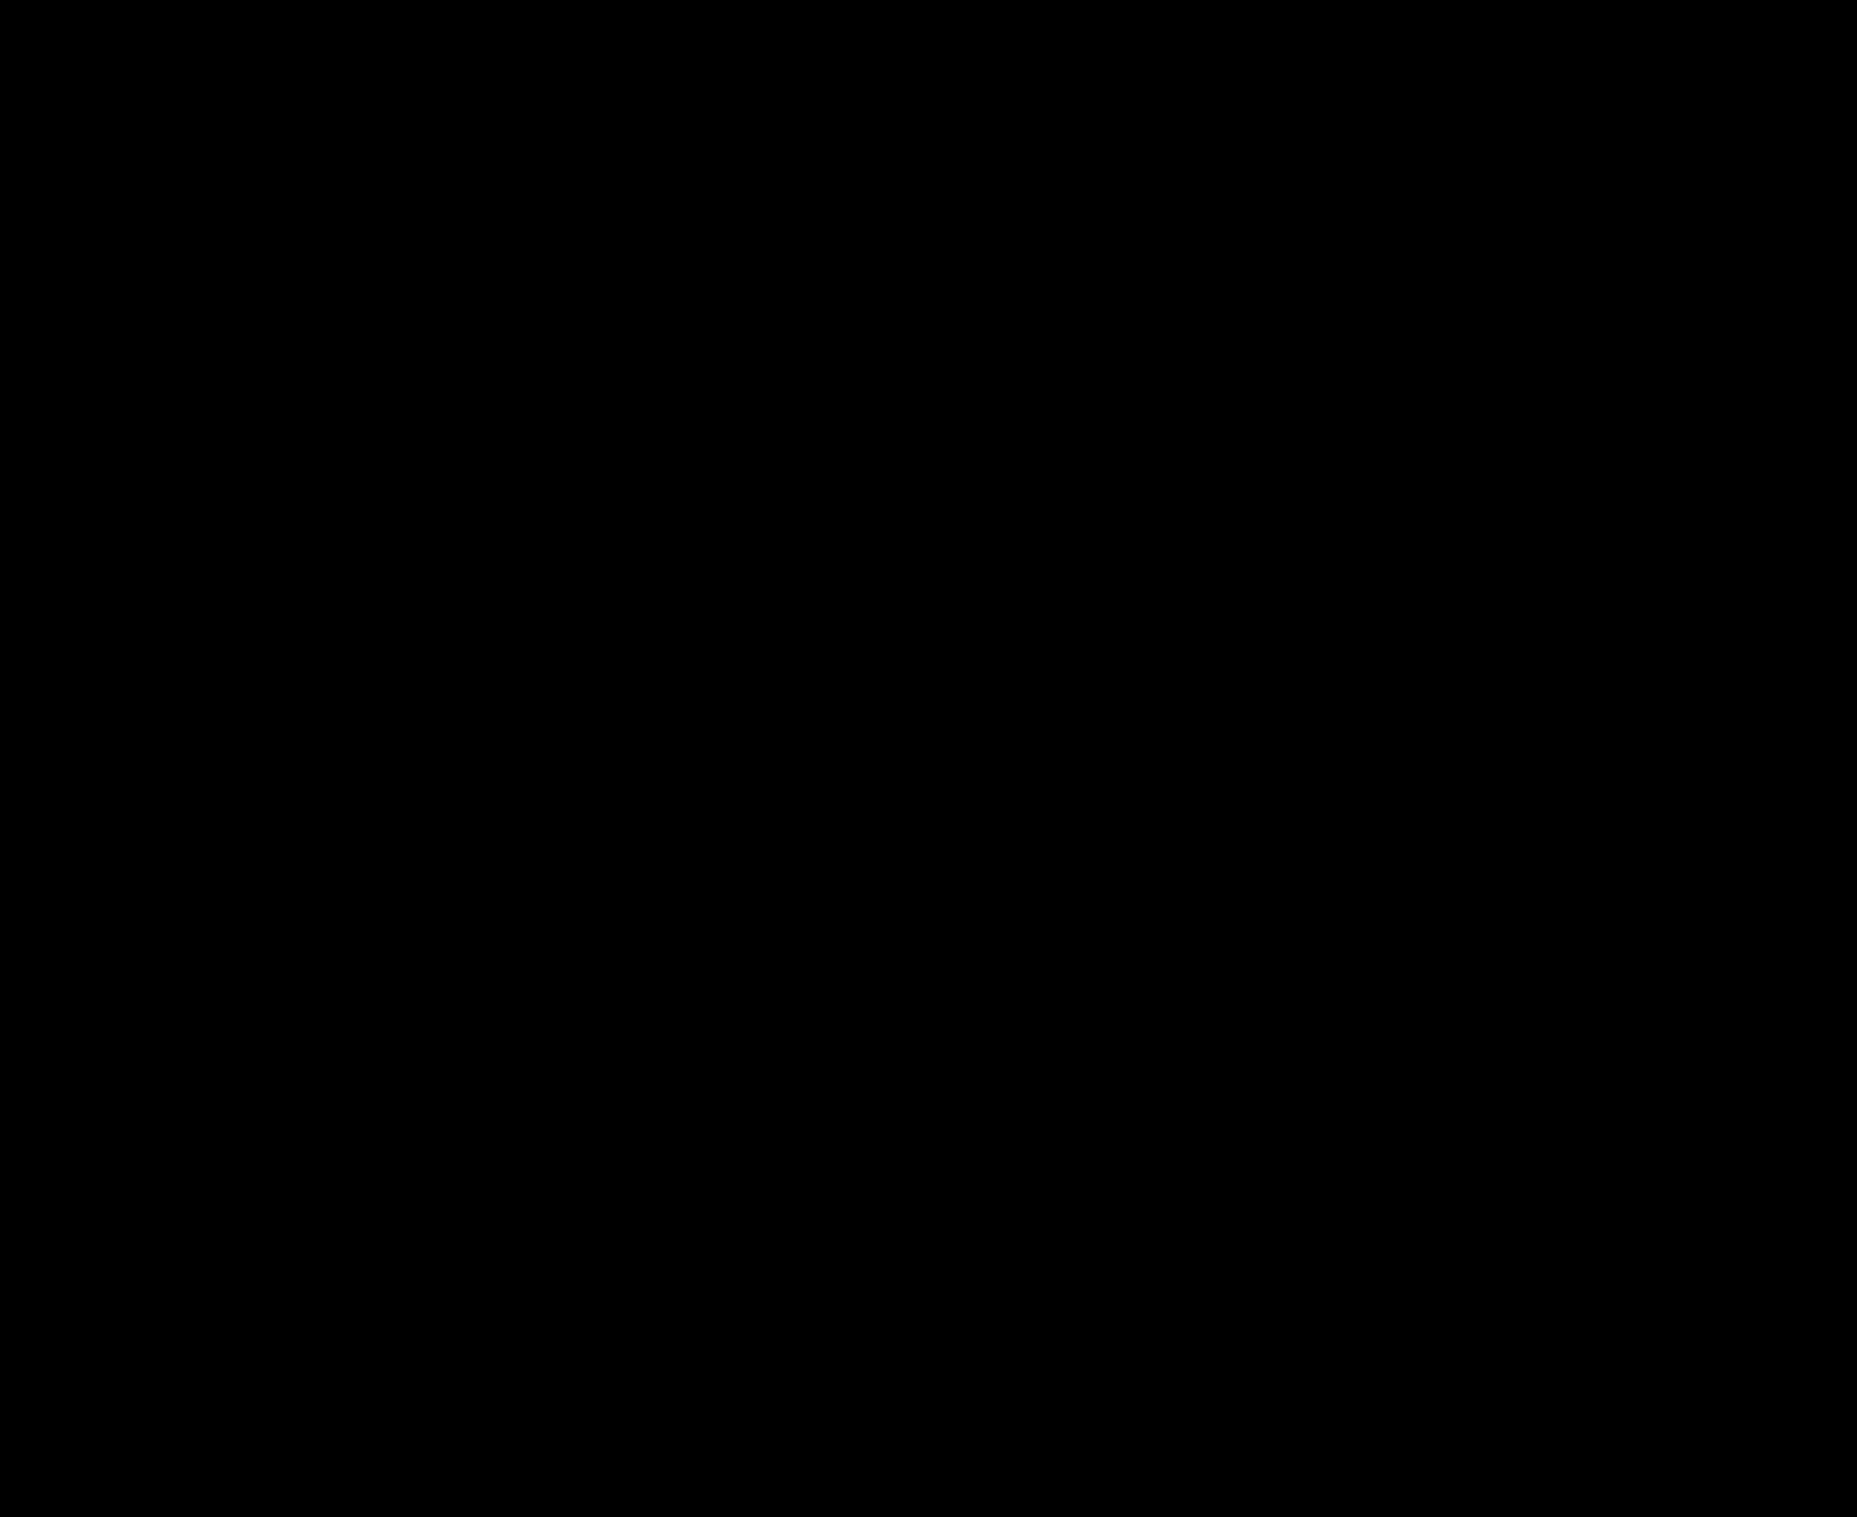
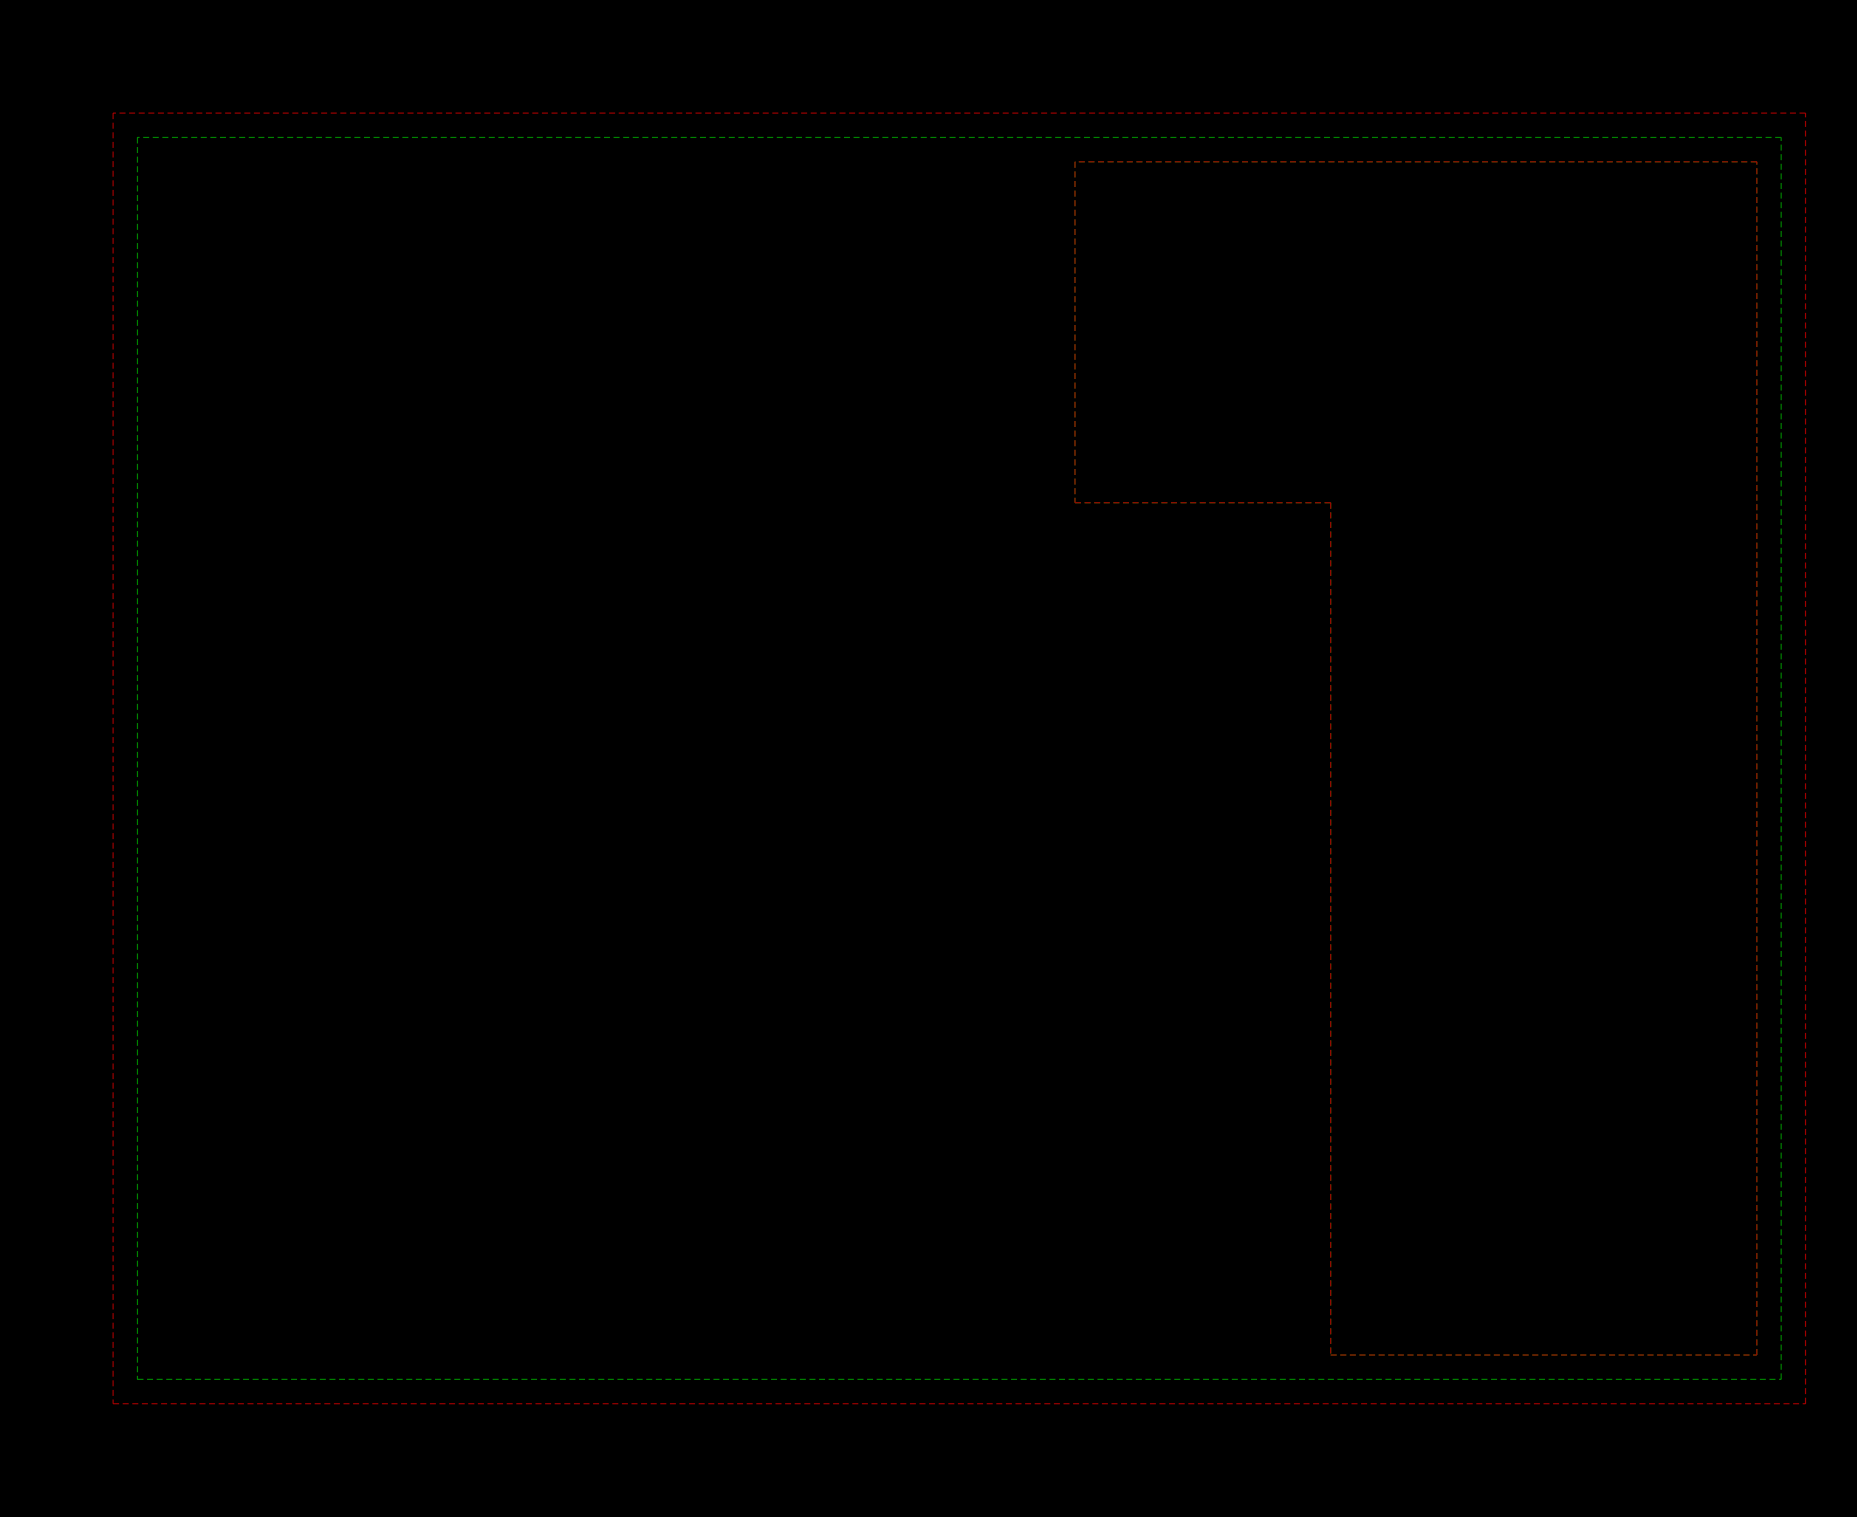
top zone outline: none -> (113, 113) (1805, 113) (1805, 1403) (113, 1403) (113, 113)
bottom zone outline: none -> (137, 137) (1781, 137) (1781, 1379) (137, 1379) (137, 137)
top zone outline: none -> (1074, 161) (1756, 161) (1756, 1355) (1330, 1355) (1330, 502) (1074, 502) (1074, 161)

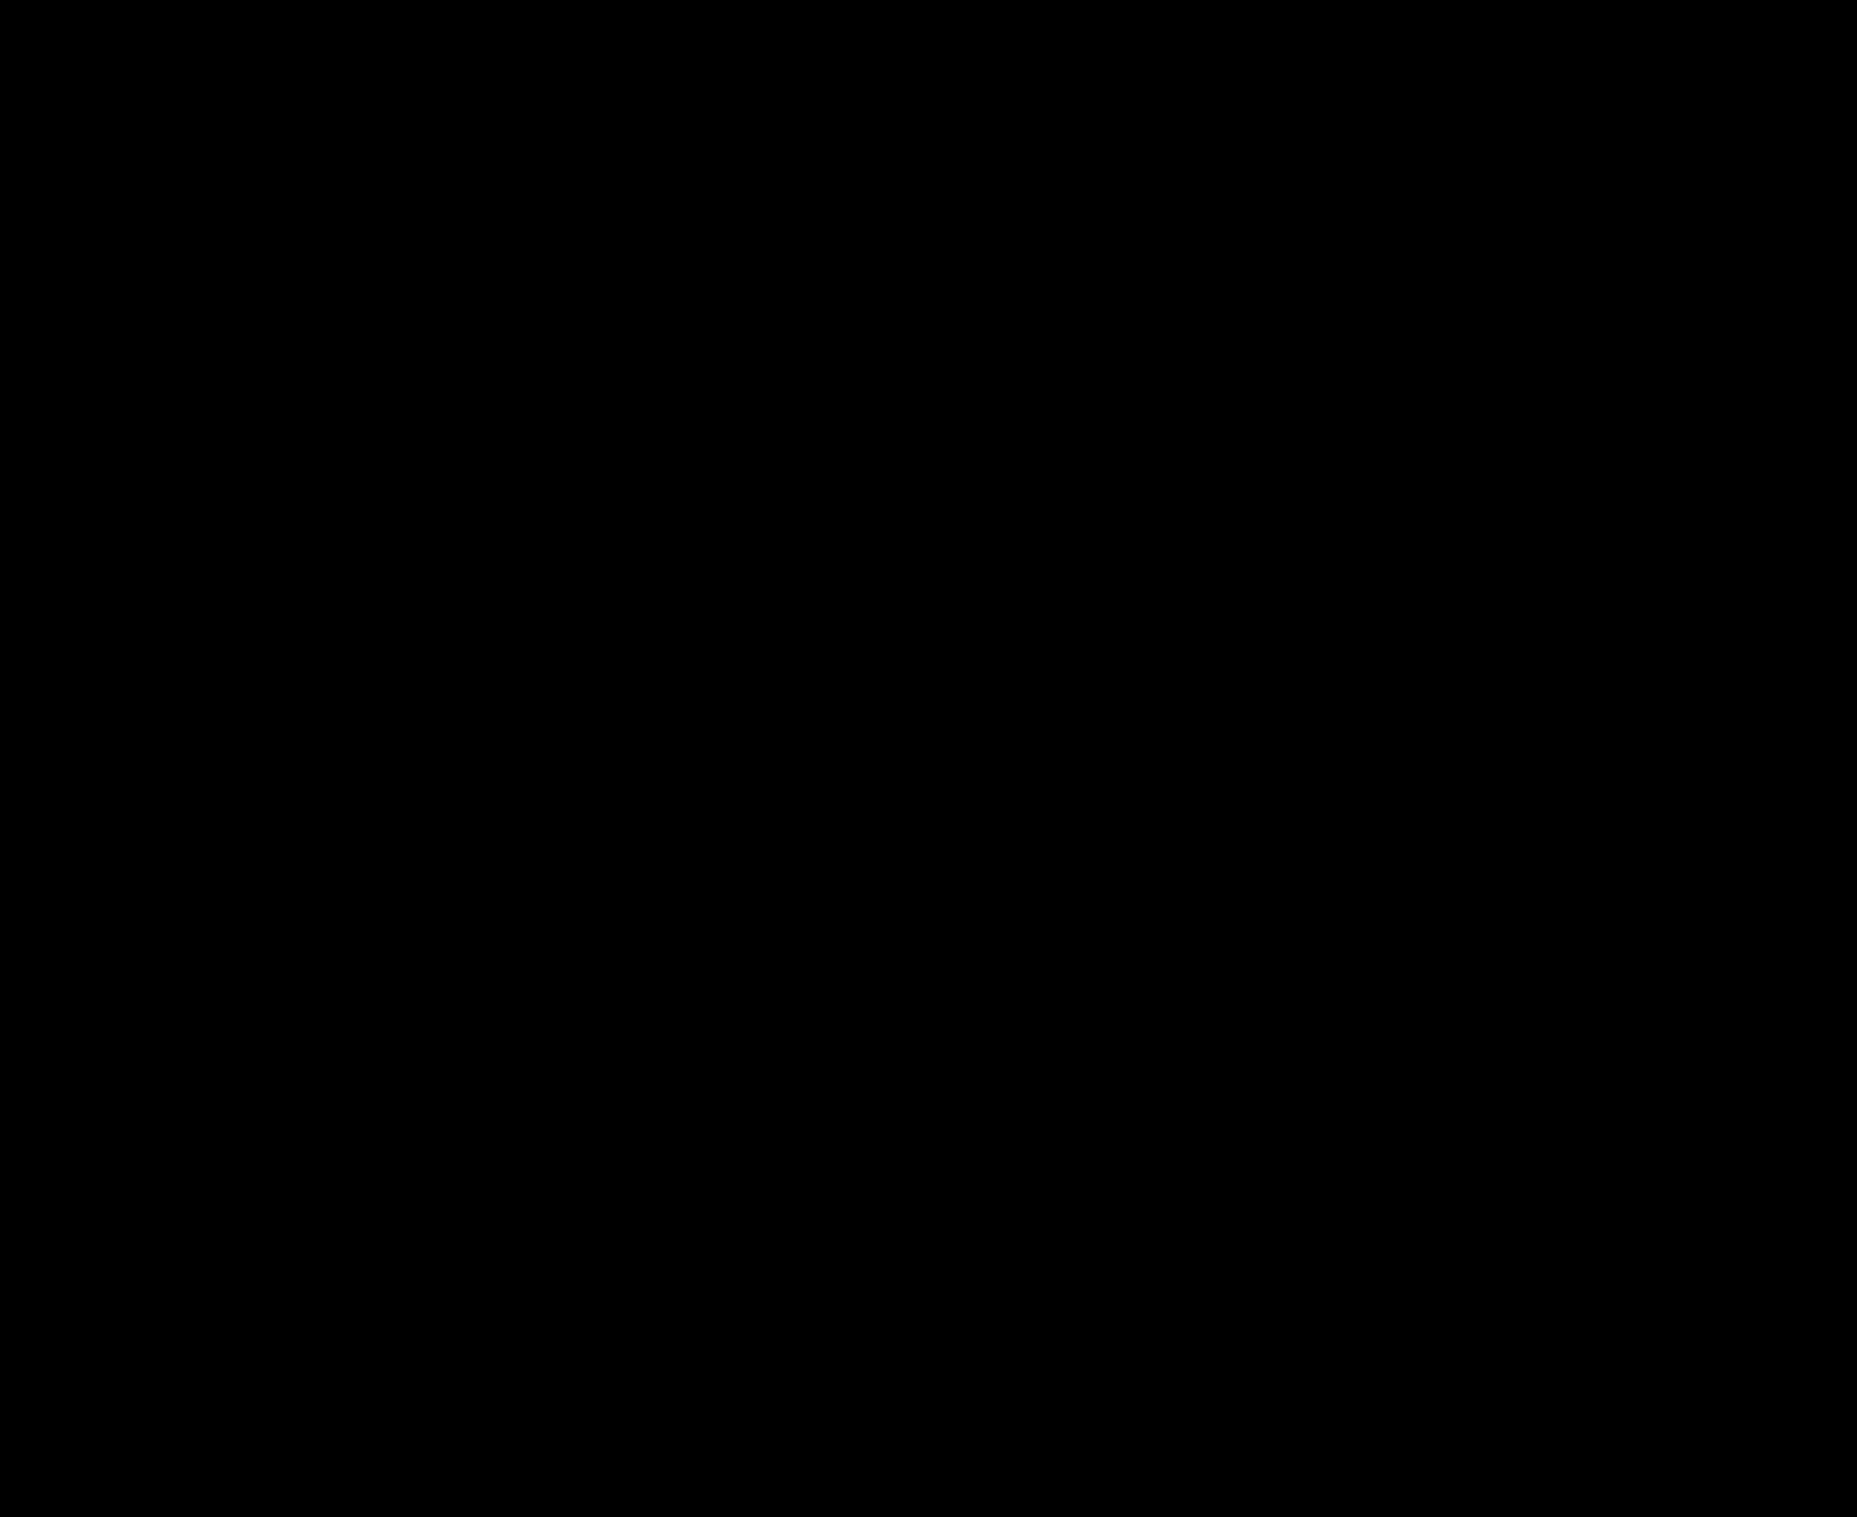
top zone outline: (113, 113) (1805, 113) (1805, 1403) (113, 1403) (113, 113) -> none
bottom zone outline: (137, 137) (1781, 137) (1781, 1379) (137, 1379) (137, 137) -> none
top zone outline: (1074, 161) (1756, 161) (1756, 1355) (1330, 1355) (1330, 502) (1074, 502) (1074, 161) -> none

